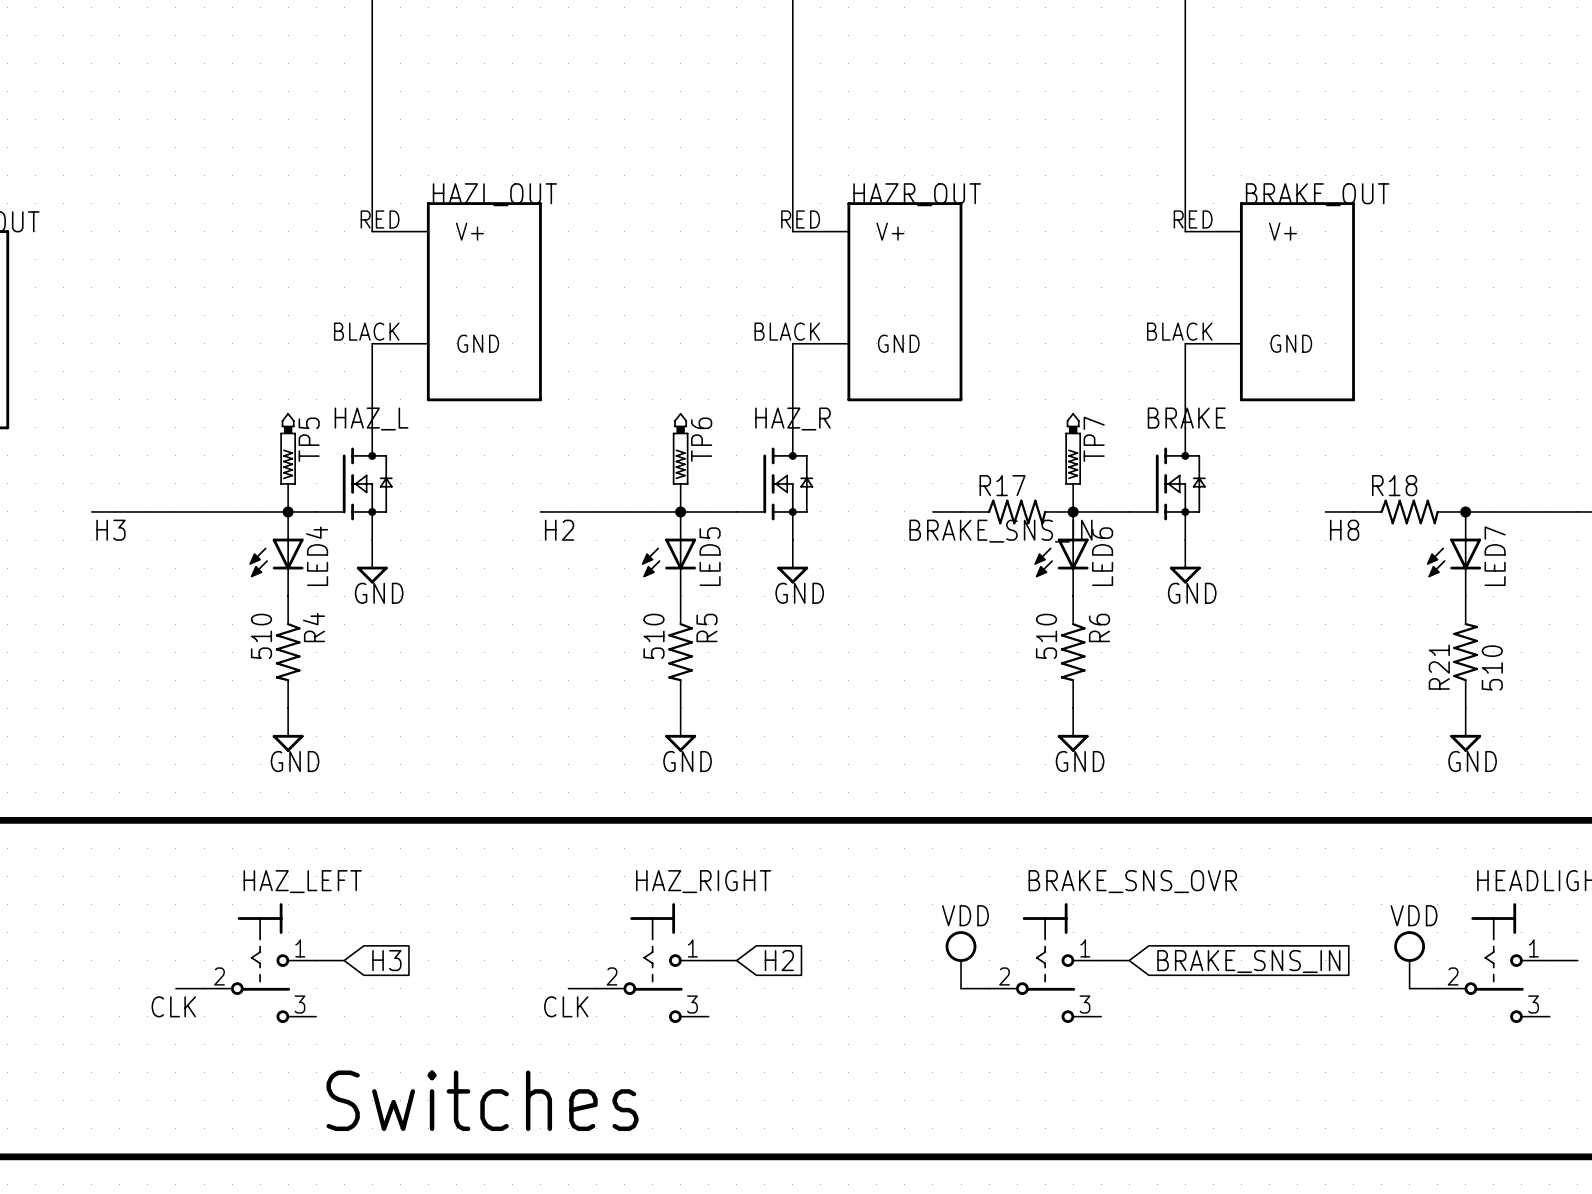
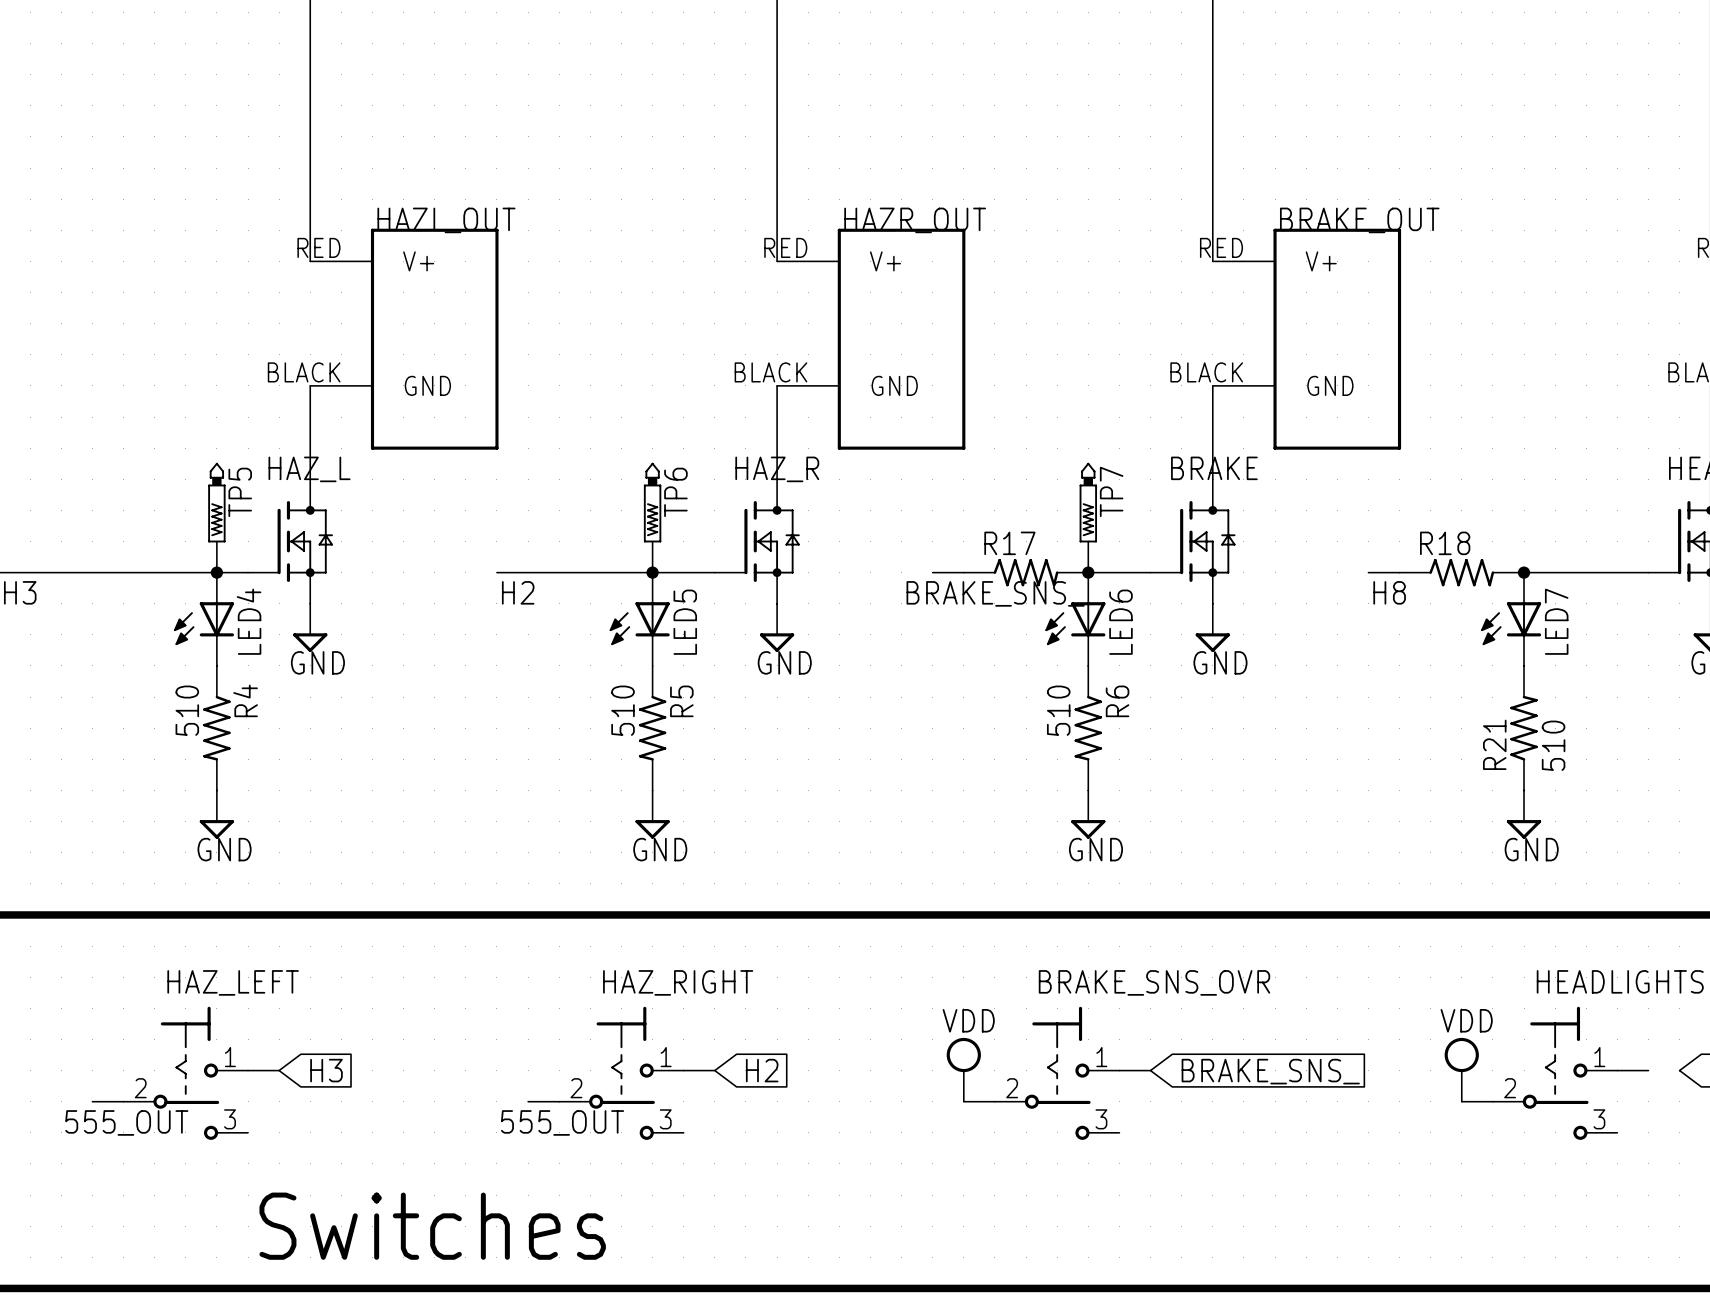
label: BRAKE_SNS_IN (1001, 531) -> BRAKE_SNS_ (995, 593)
global label: BRAKE_SNS_IN (1248, 961) -> BRAKE_SNS_ (1270, 1071)
label: CLK (173, 1006) -> 555_OUT (126, 1122)
label: CLK (566, 1006) -> 555_OUT (562, 1122)

